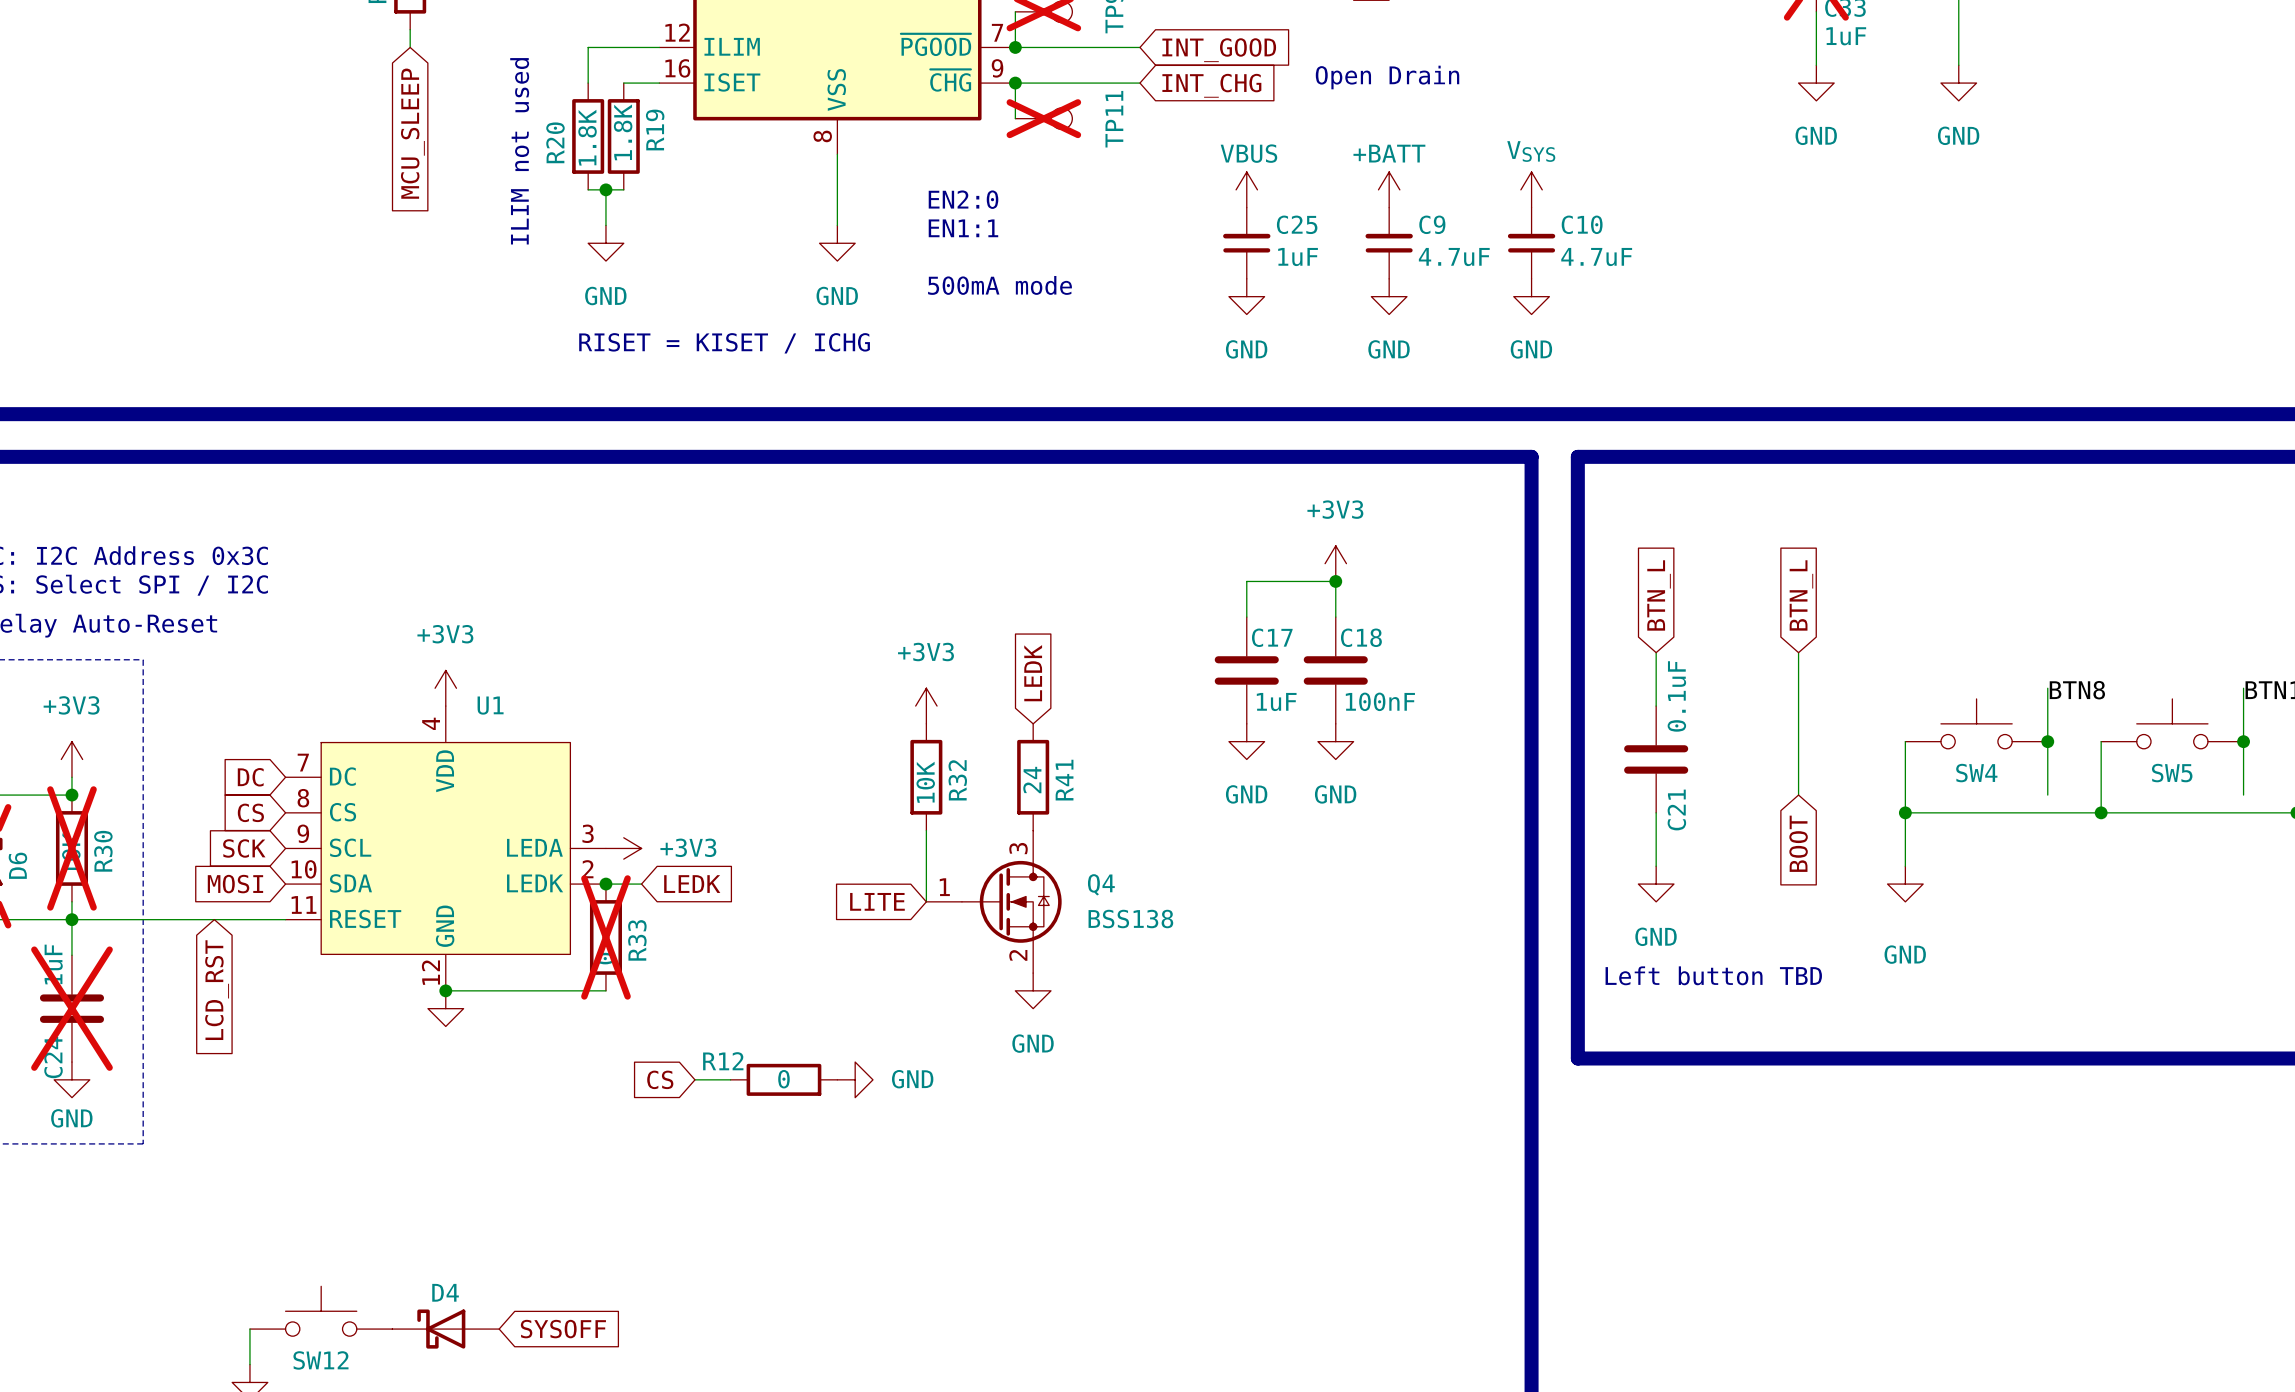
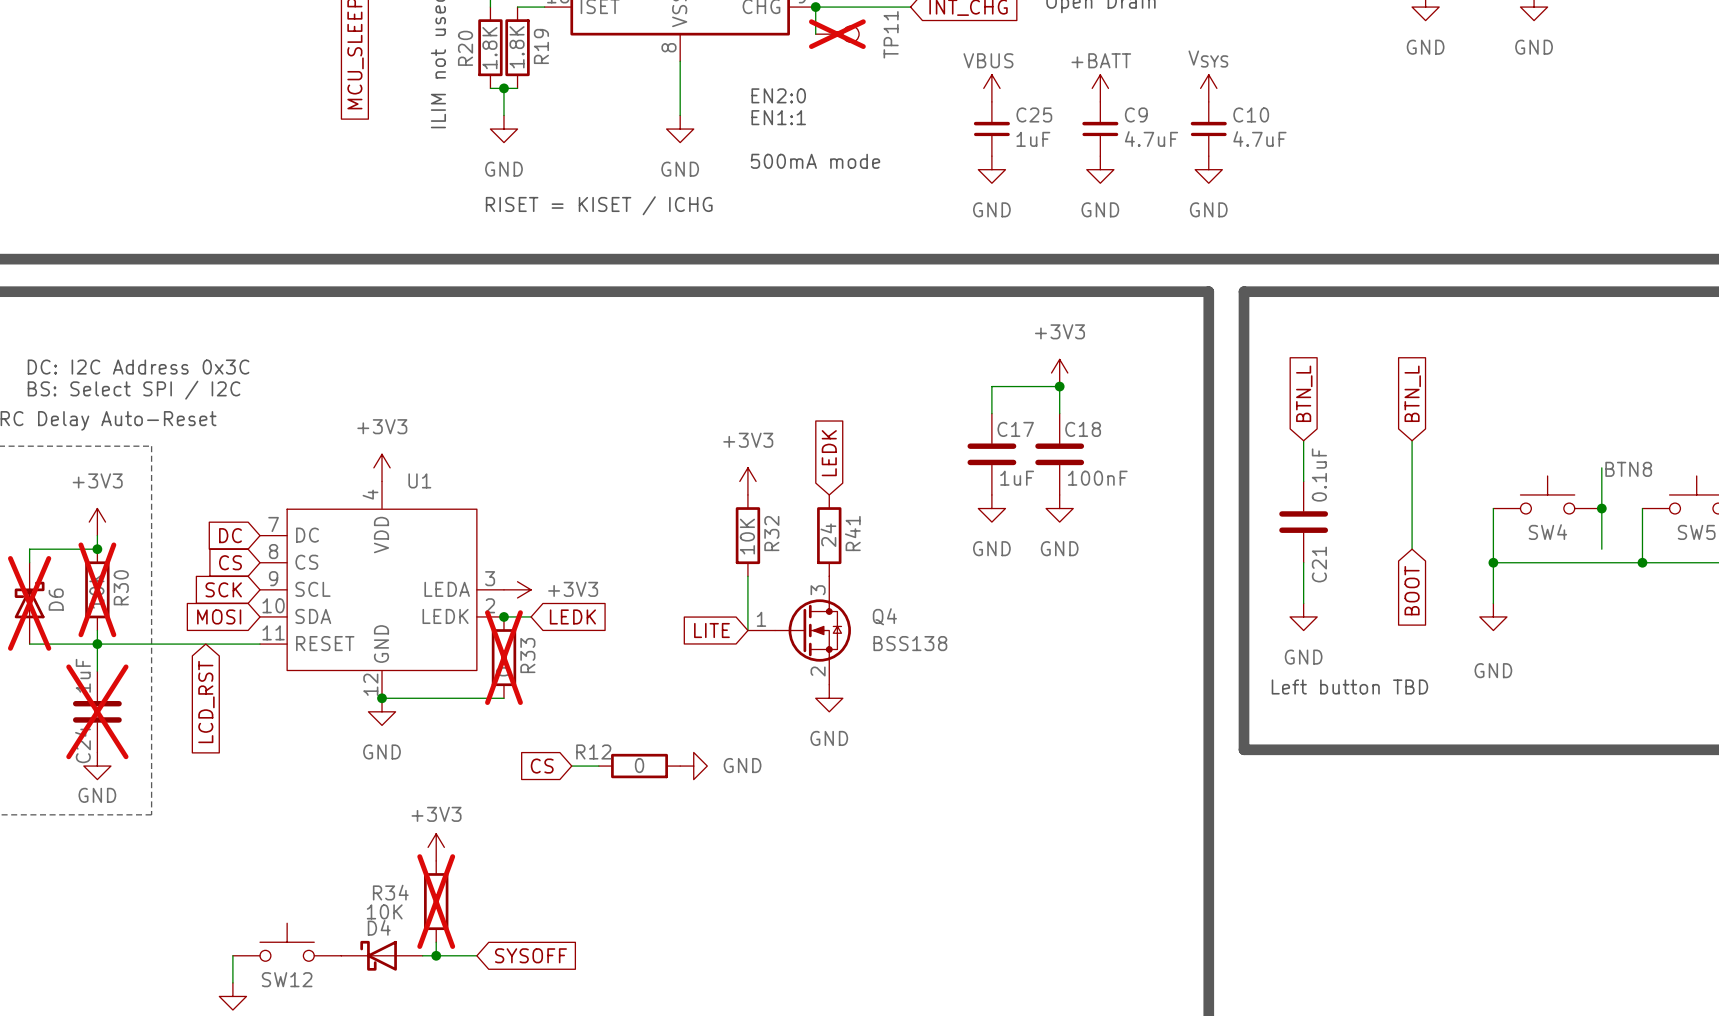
power symbol text: none -> GND (382, 751)
power symbol: none -> +3V3 (436, 847)
R34: none -> 10K (436, 901)
wire: none -> (436, 942) (436, 955)
wire: none -> (422, 955) (476, 955)
junction: none -> (436, 955)
global label position: SYSOFF (563, 1329) -> SYSOFF (530, 955)

